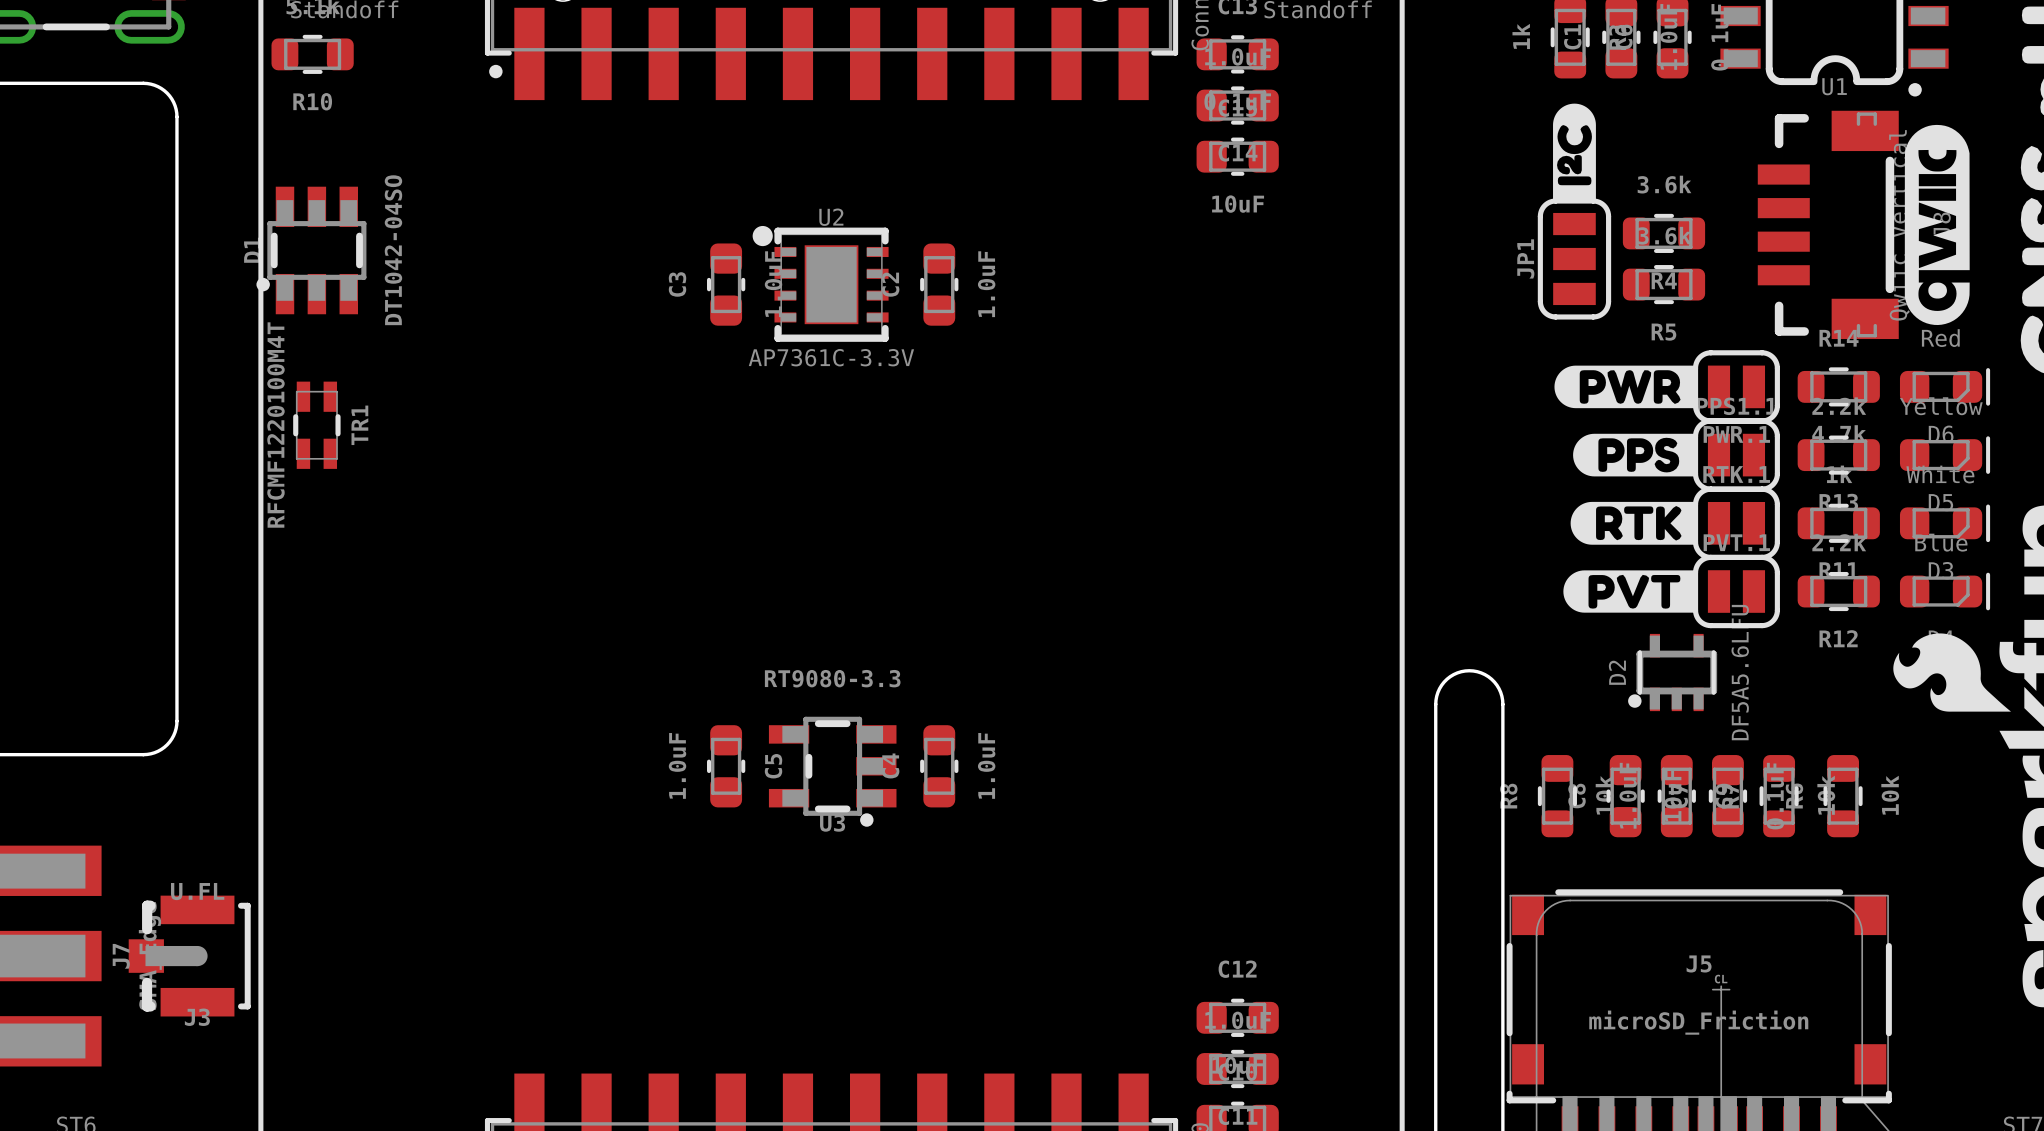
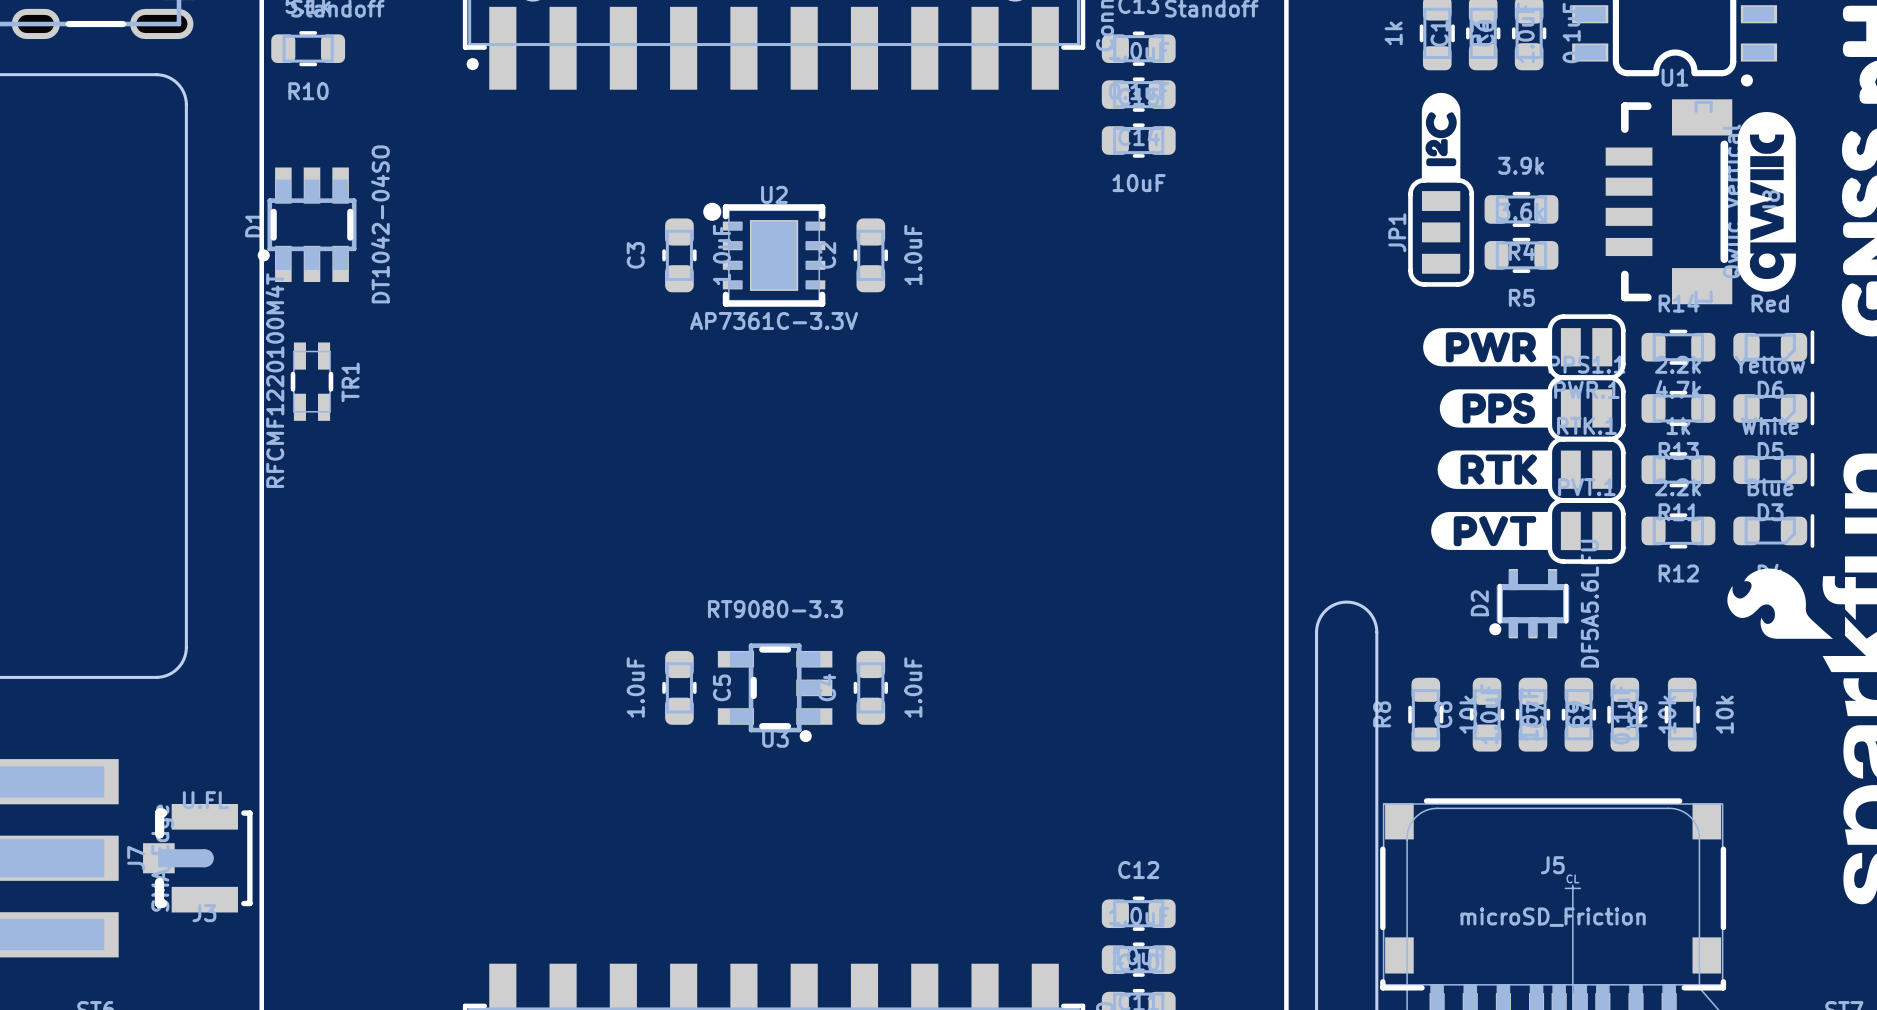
R4 value: 3.6k (1664, 184) -> 3.9k (1521, 165)

